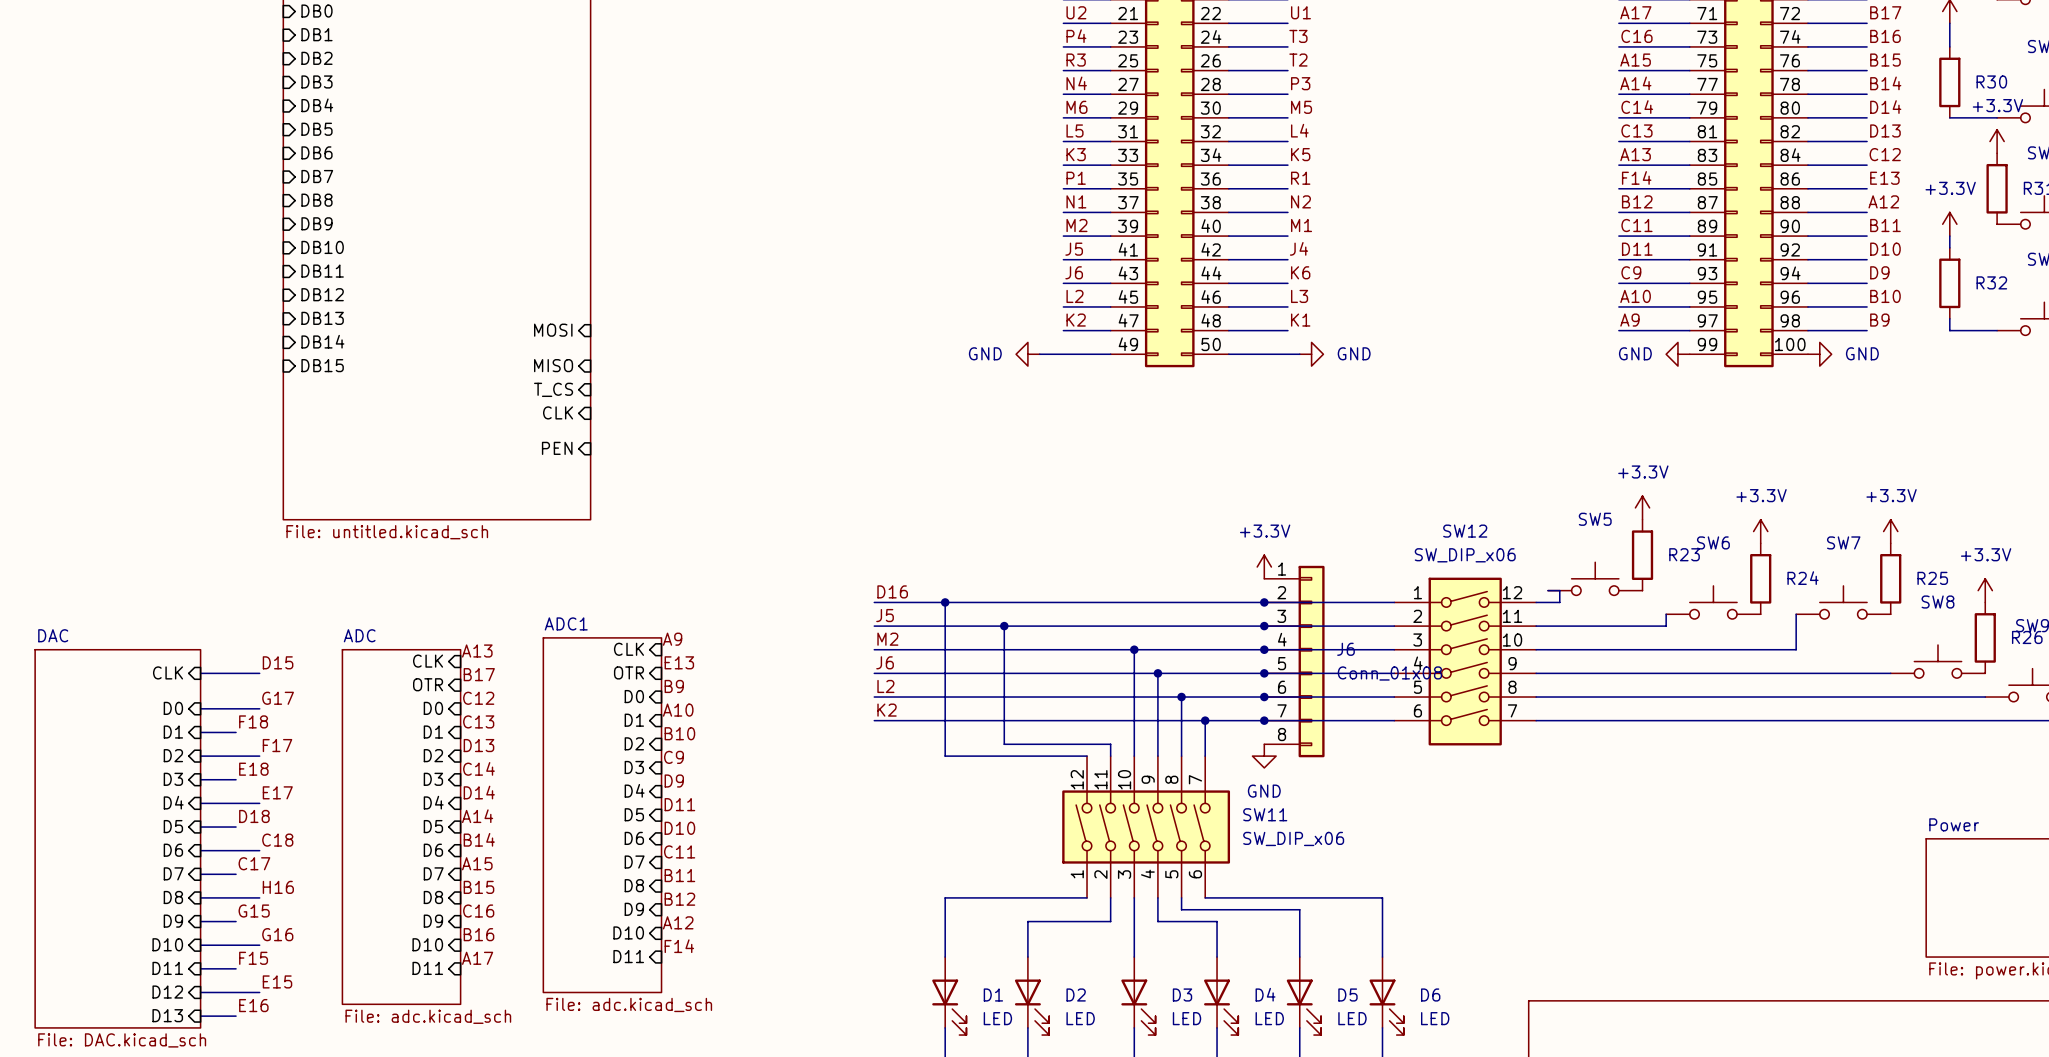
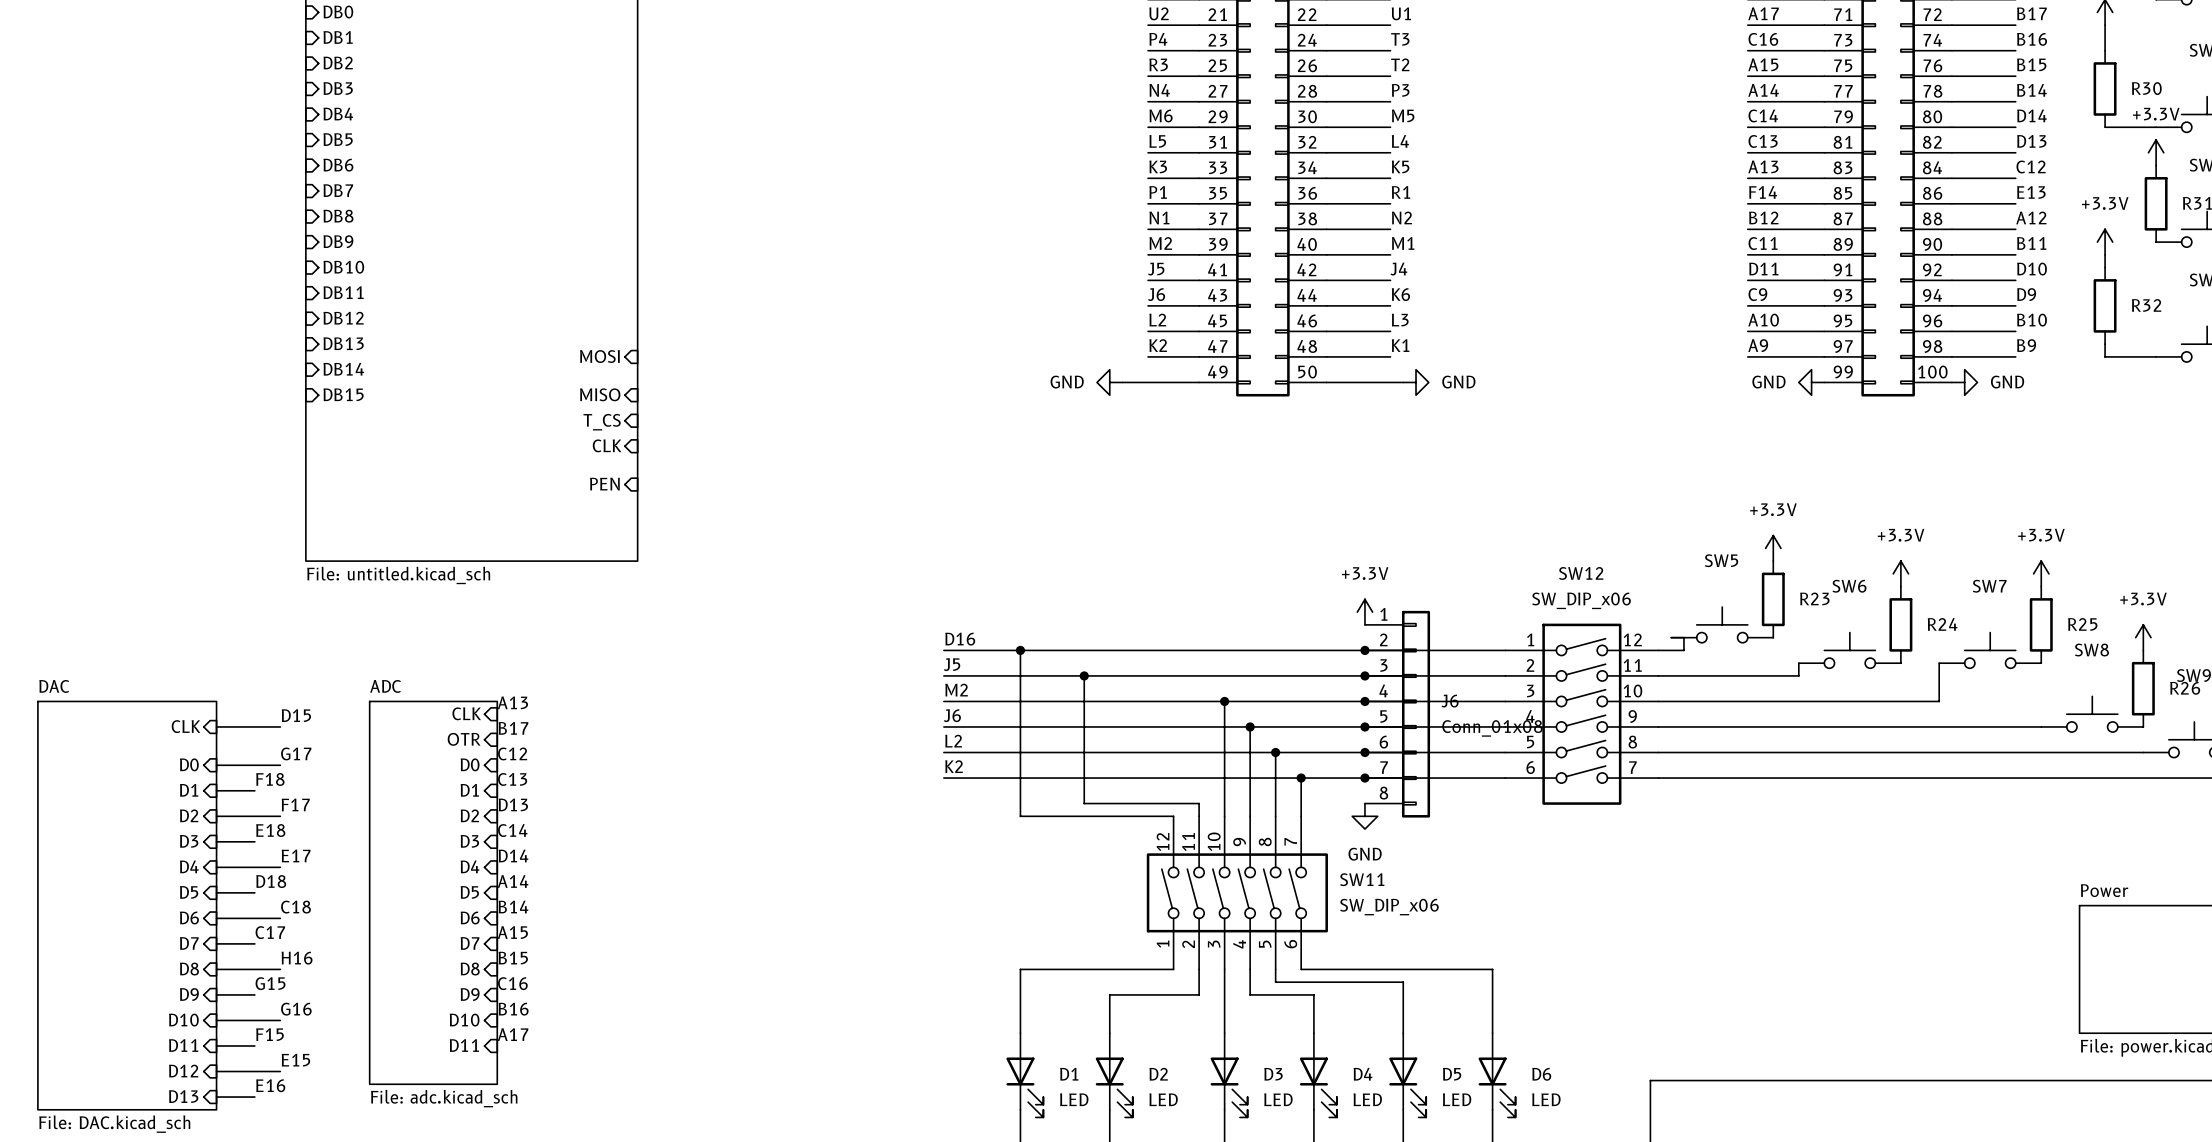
label: A9 (672, 639) -> none
sheet pin: CLK (628, 649) -> none
label: E13 (679, 662) -> none
sheet pin: OTR (628, 672) -> none
label: B9 (674, 686) -> none
sheet pin: D0 (634, 696) -> none
label: A10 (678, 710) -> none
sheet pin: D1 (634, 720) -> none
label: B10 (679, 733) -> none
sheet pin: D2 (634, 743) -> none
label: C9 (674, 757) -> none
sheet pin: D3 (634, 767) -> none
label: D9 (674, 781) -> none
sheet pin: D4 (634, 790) -> none
label: D11 (679, 804) -> none
sheet pin: D5 (634, 814) -> none
sheet ADC1: File: adc.kicad_sch (602, 815) -> none
label: D10 (679, 828) -> none
sheet pin: D6 (634, 838) -> none
label: C11 (679, 851) -> none
sheet pin: D7 (634, 862) -> none
label: B11 (679, 875) -> none
sheet pin: D8 (634, 885) -> none
label: B12 (679, 899) -> none
sheet pin: D9 (634, 909) -> none
label: A12 (678, 922) -> none
sheet pin: D10 (628, 932) -> none
label: F14 (679, 946) -> none
sheet pin: D11 (628, 956) -> none

